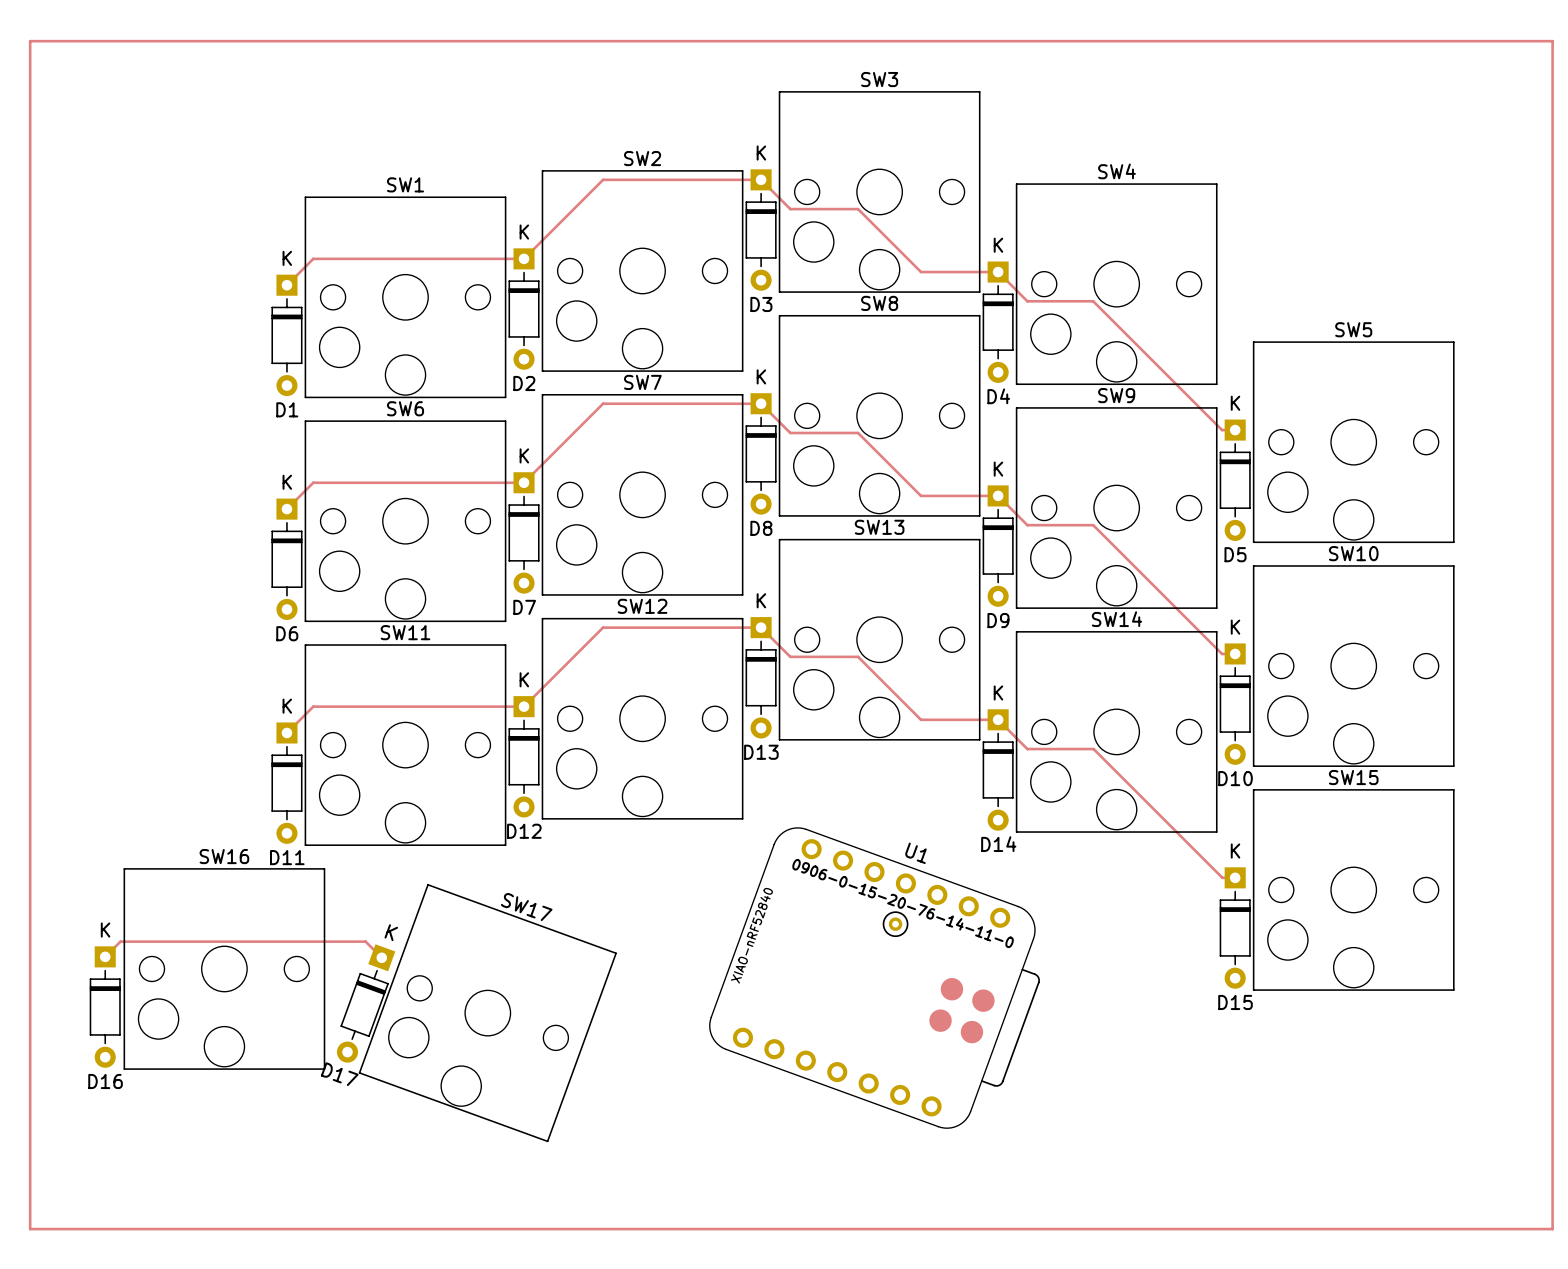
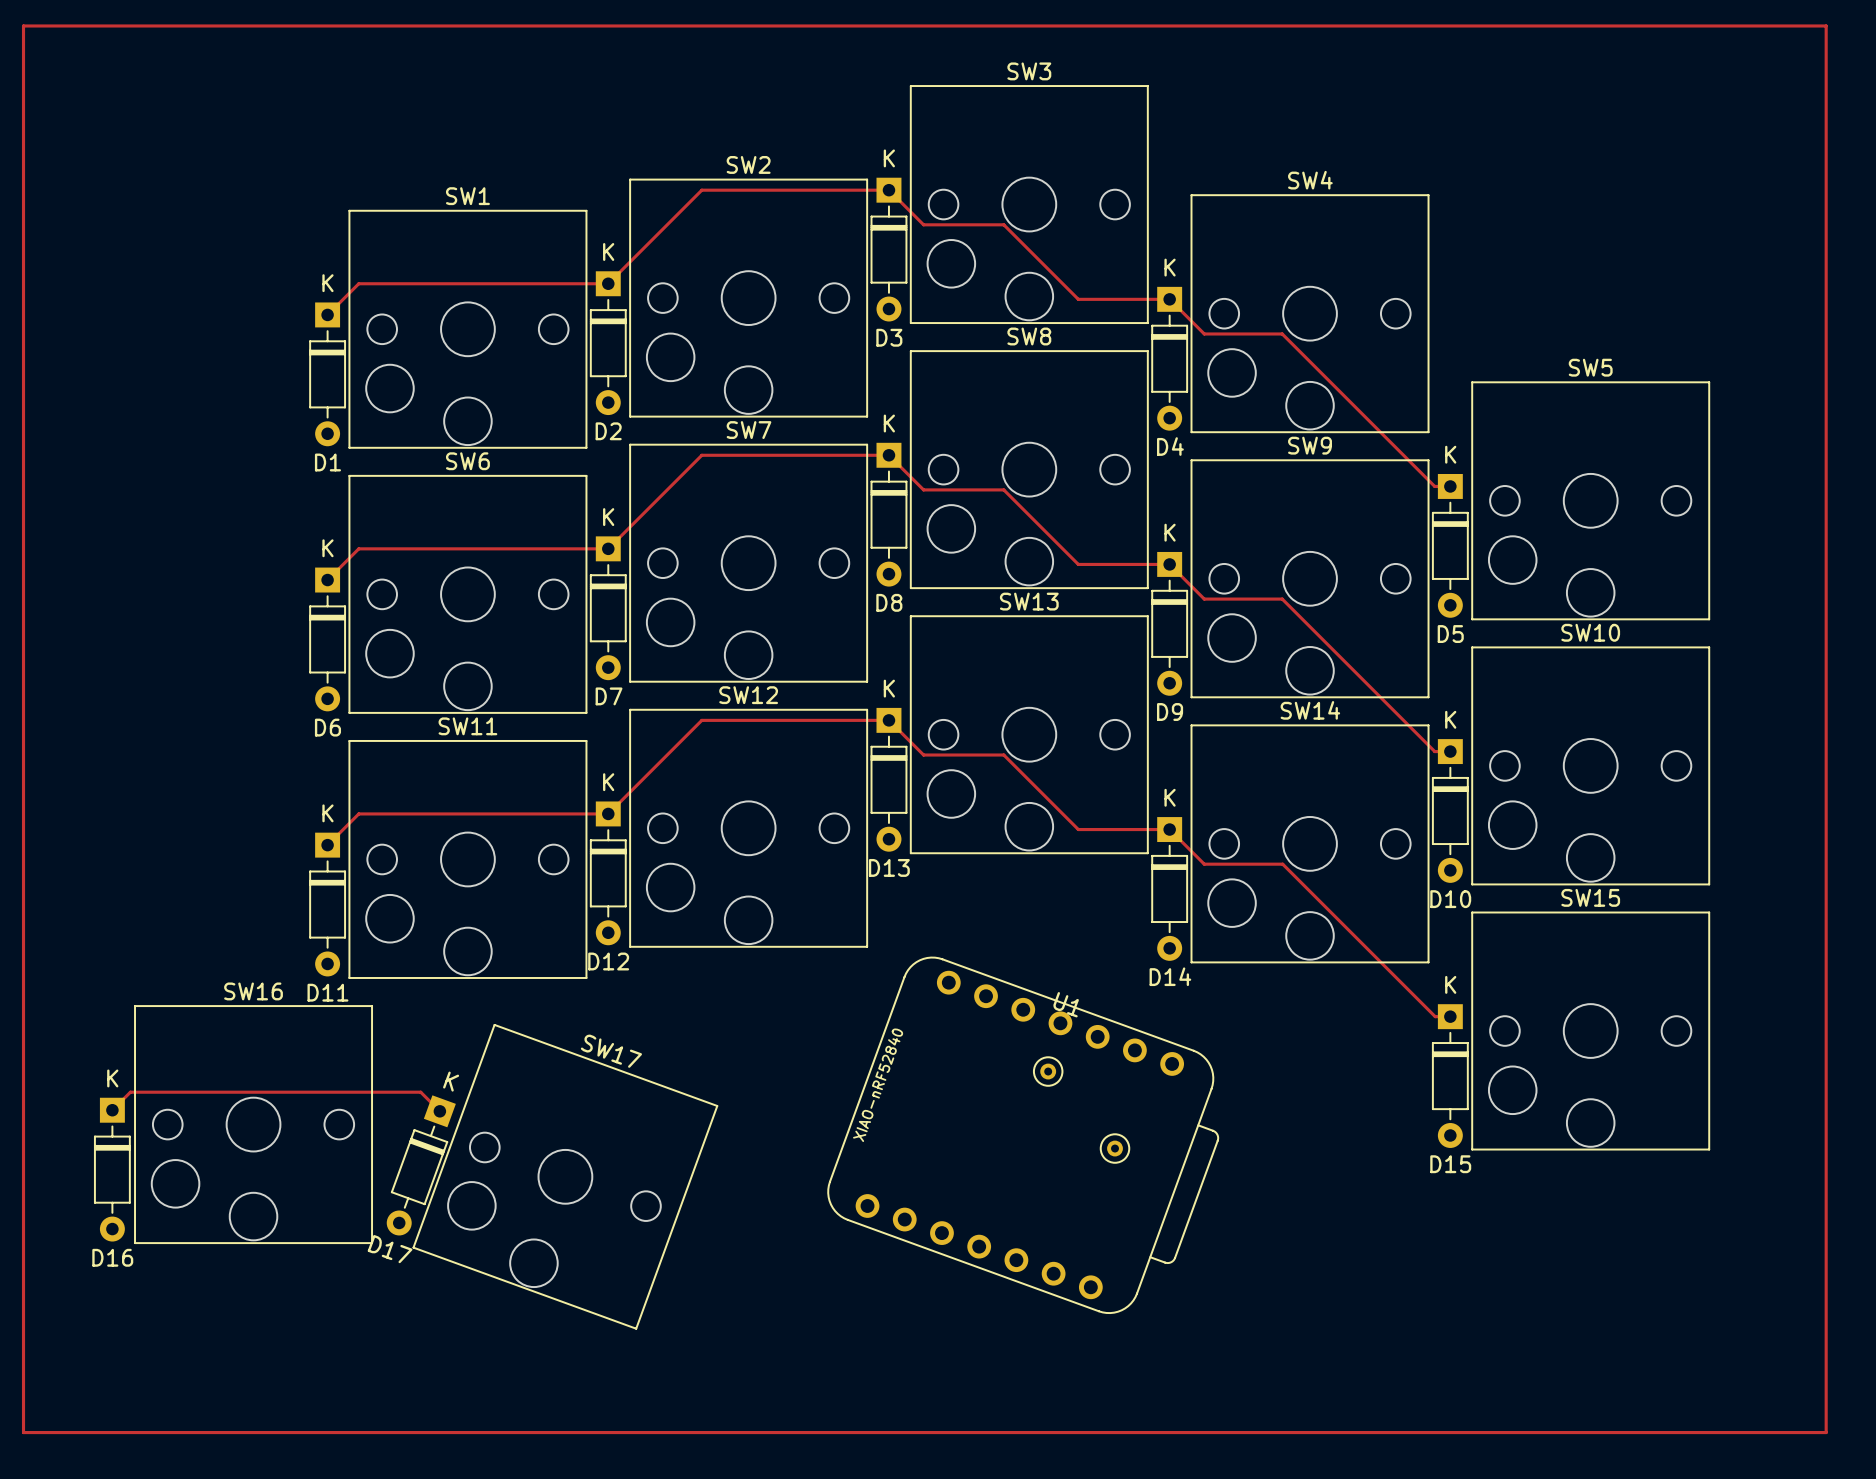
U1 footprint: [709, 827, 1040, 1129] -> [827, 956, 1220, 1314]

